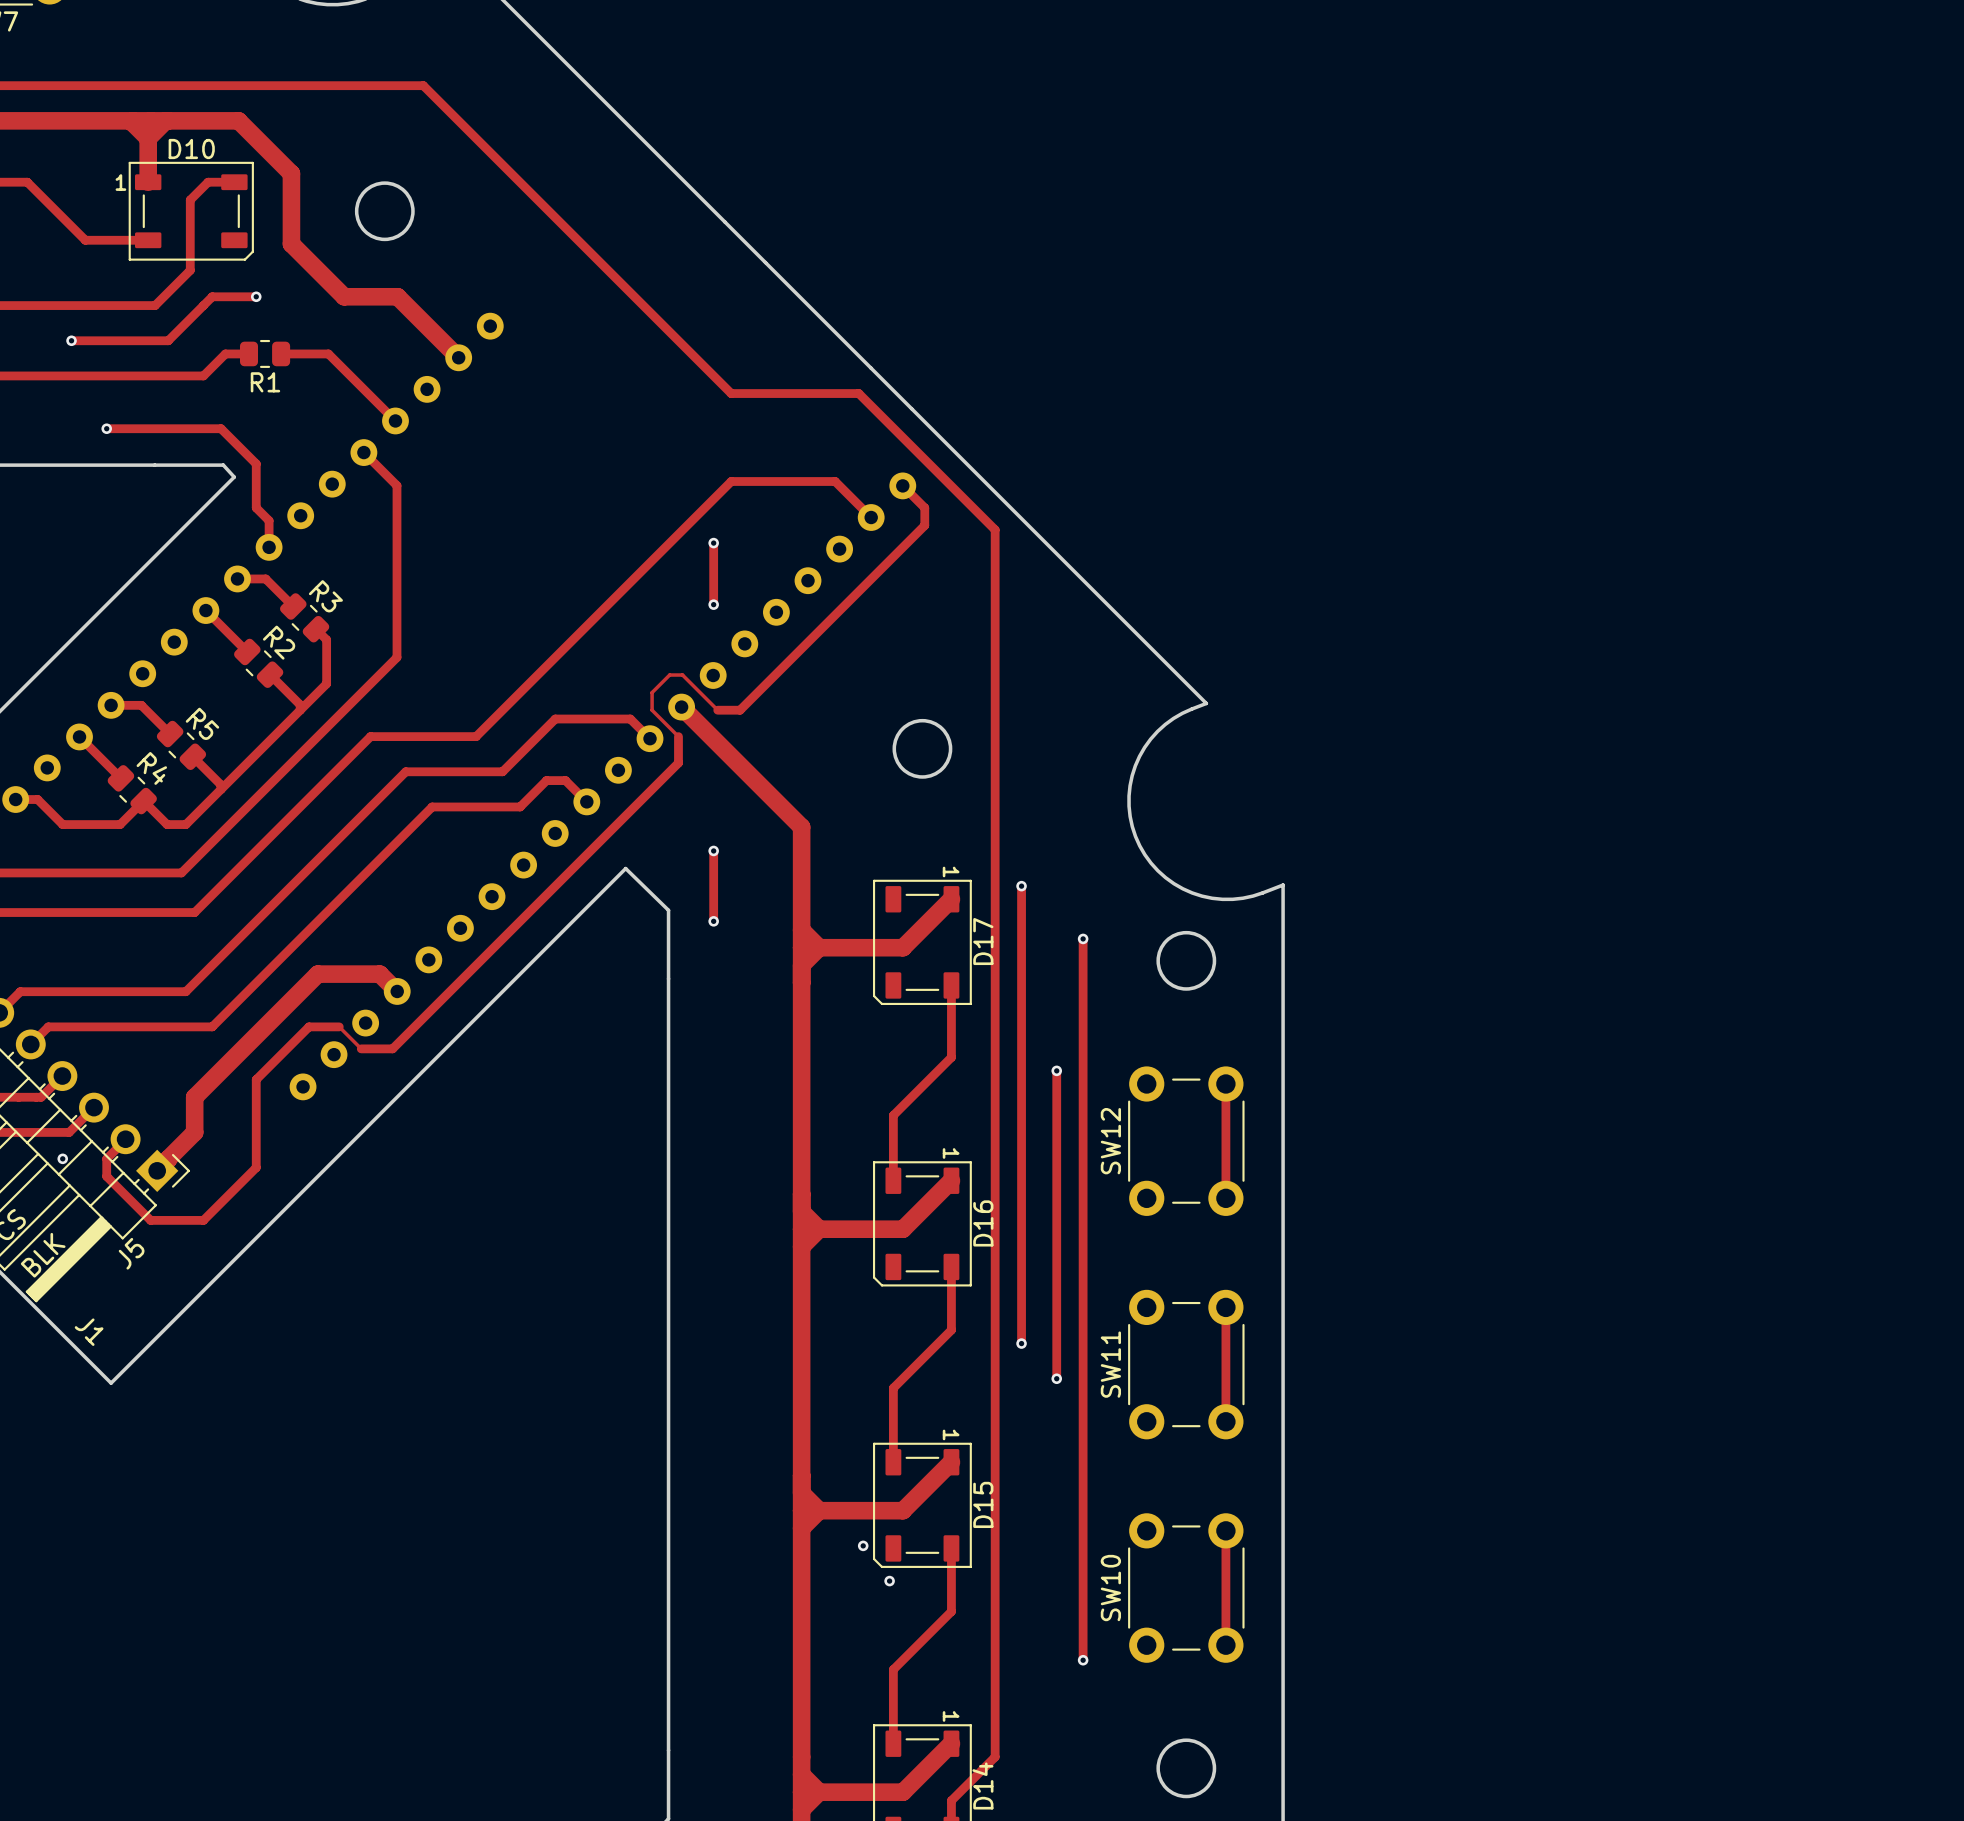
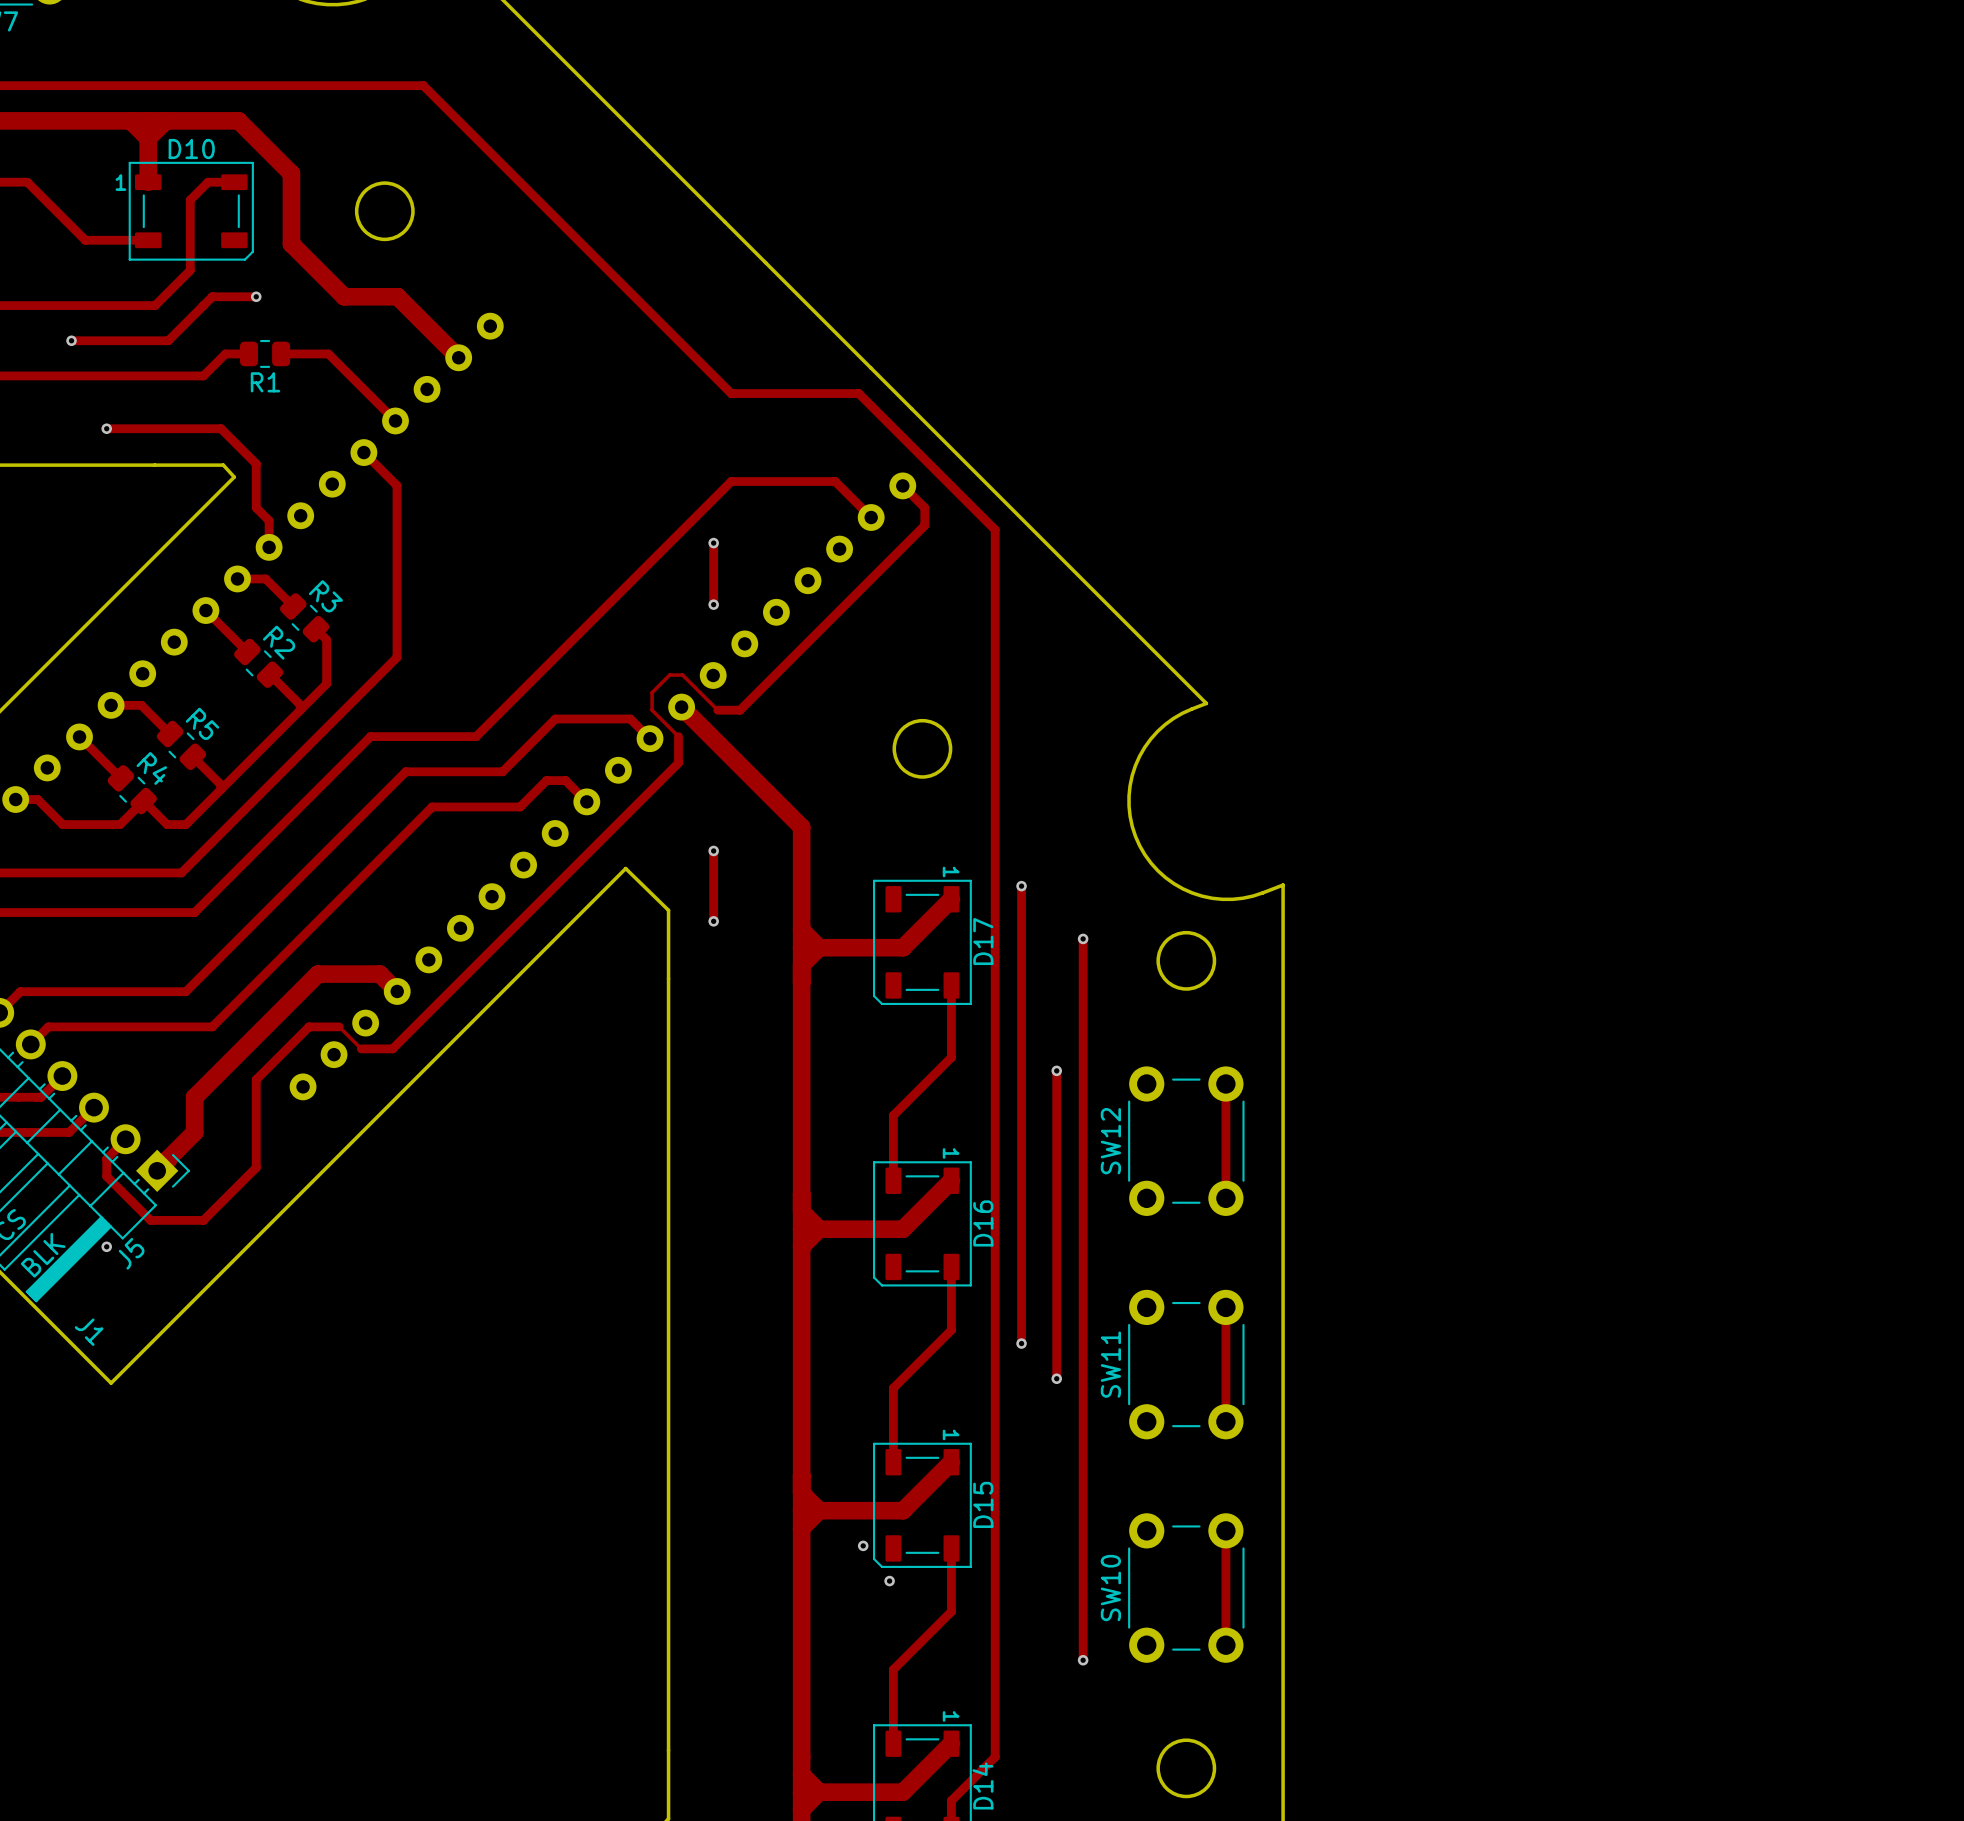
via position: (62, 1158) -> (106, 1246)

